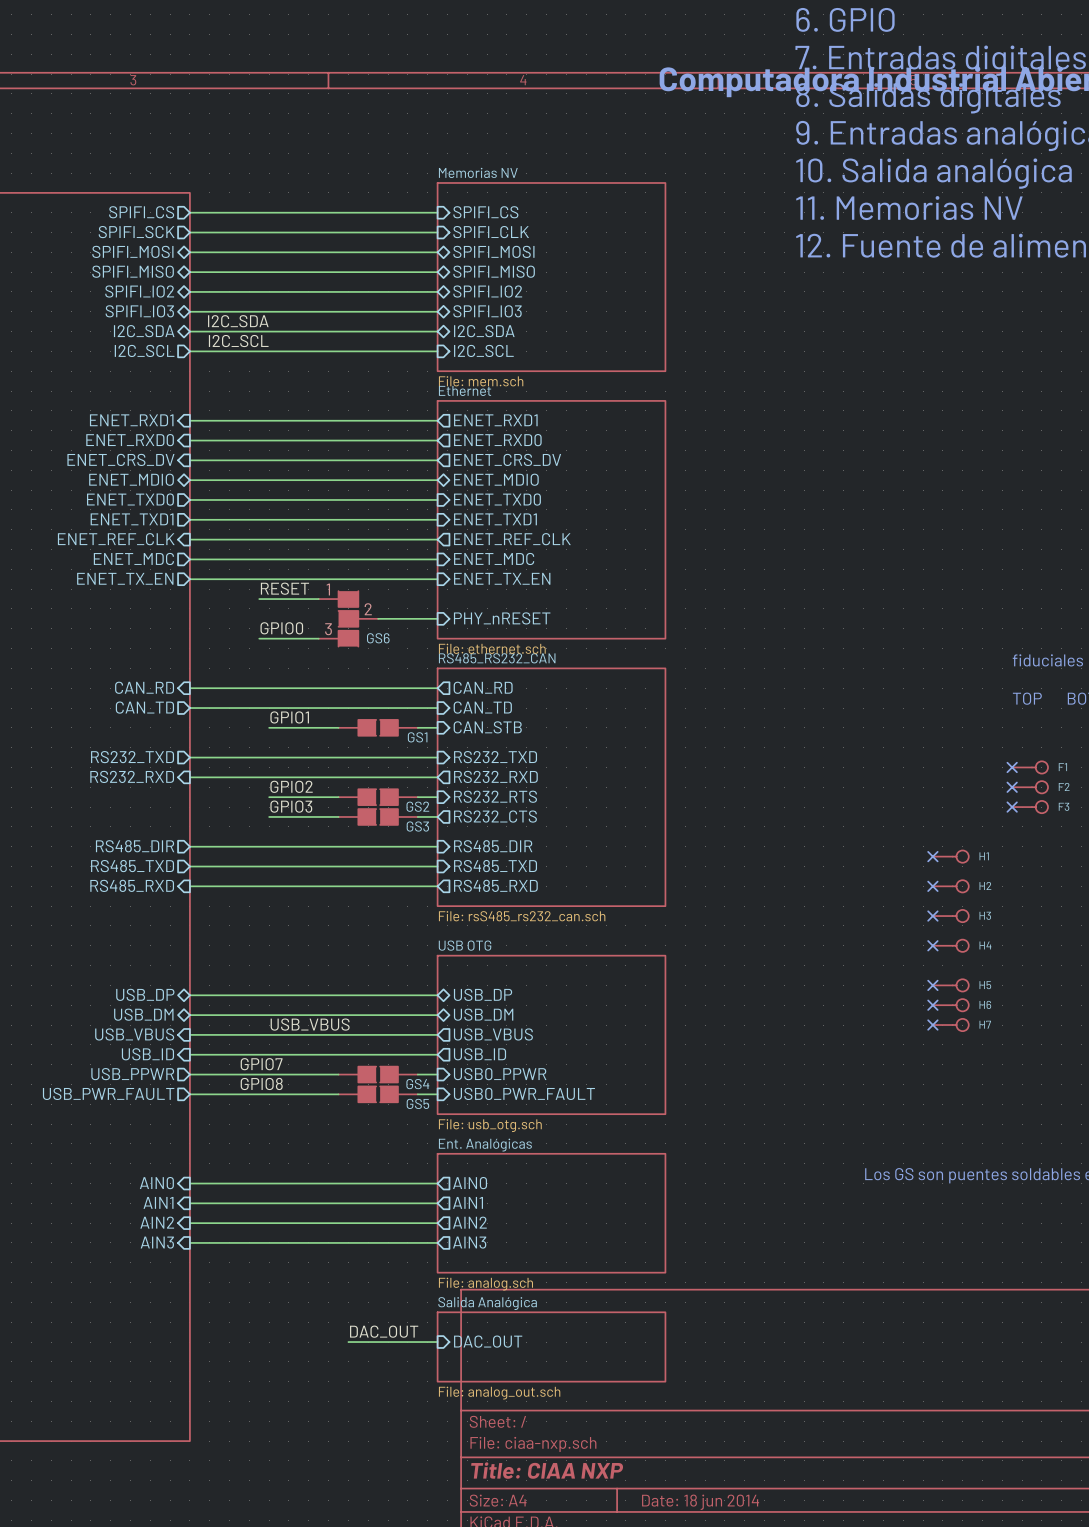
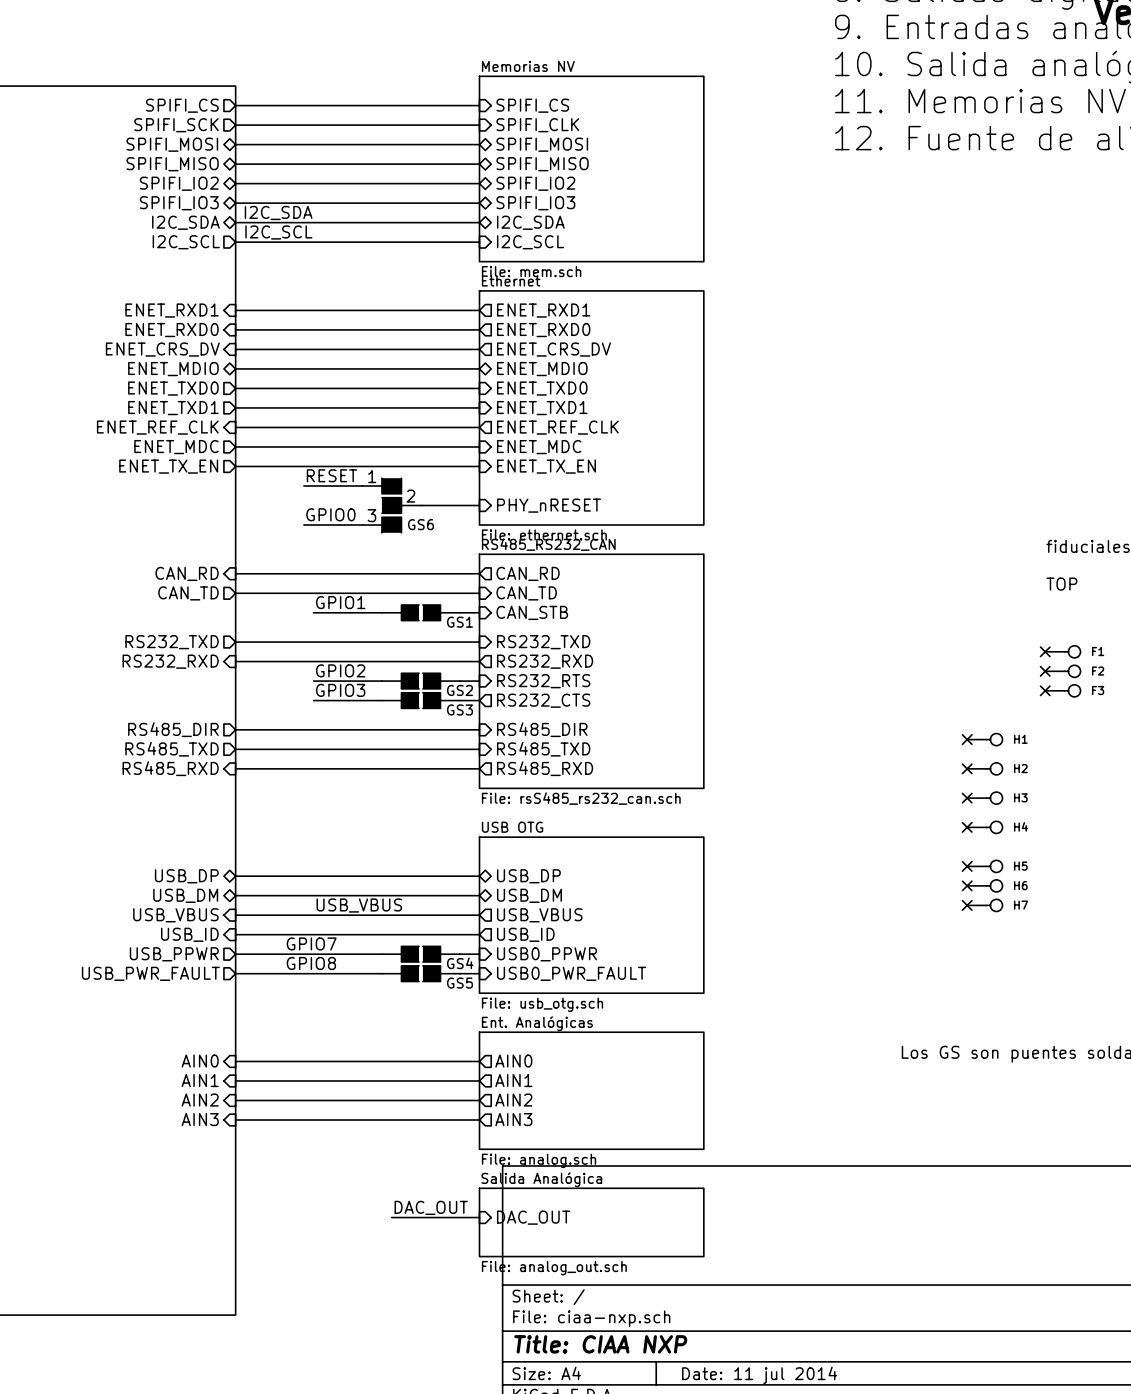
title block: Date: 18 jun 2014 (700, 1502) -> Date: 11 jul 2014 (759, 1375)

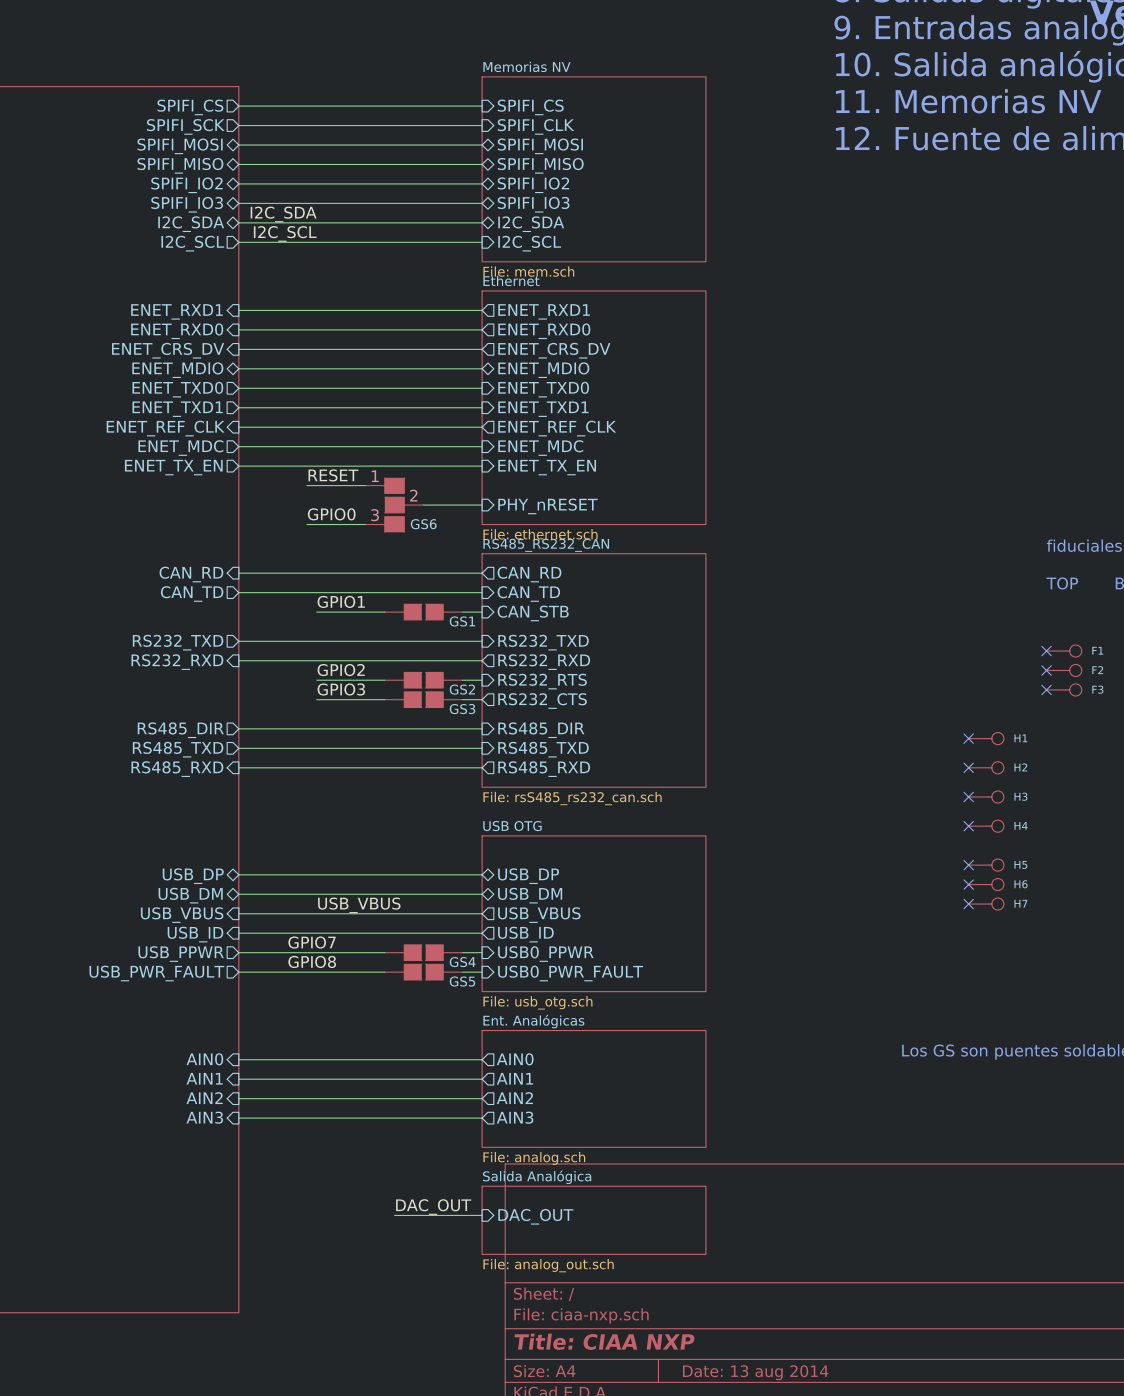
title block: Date: 11 jul 2014 (759, 1375) -> Date: 13 aug 2014 (755, 1372)

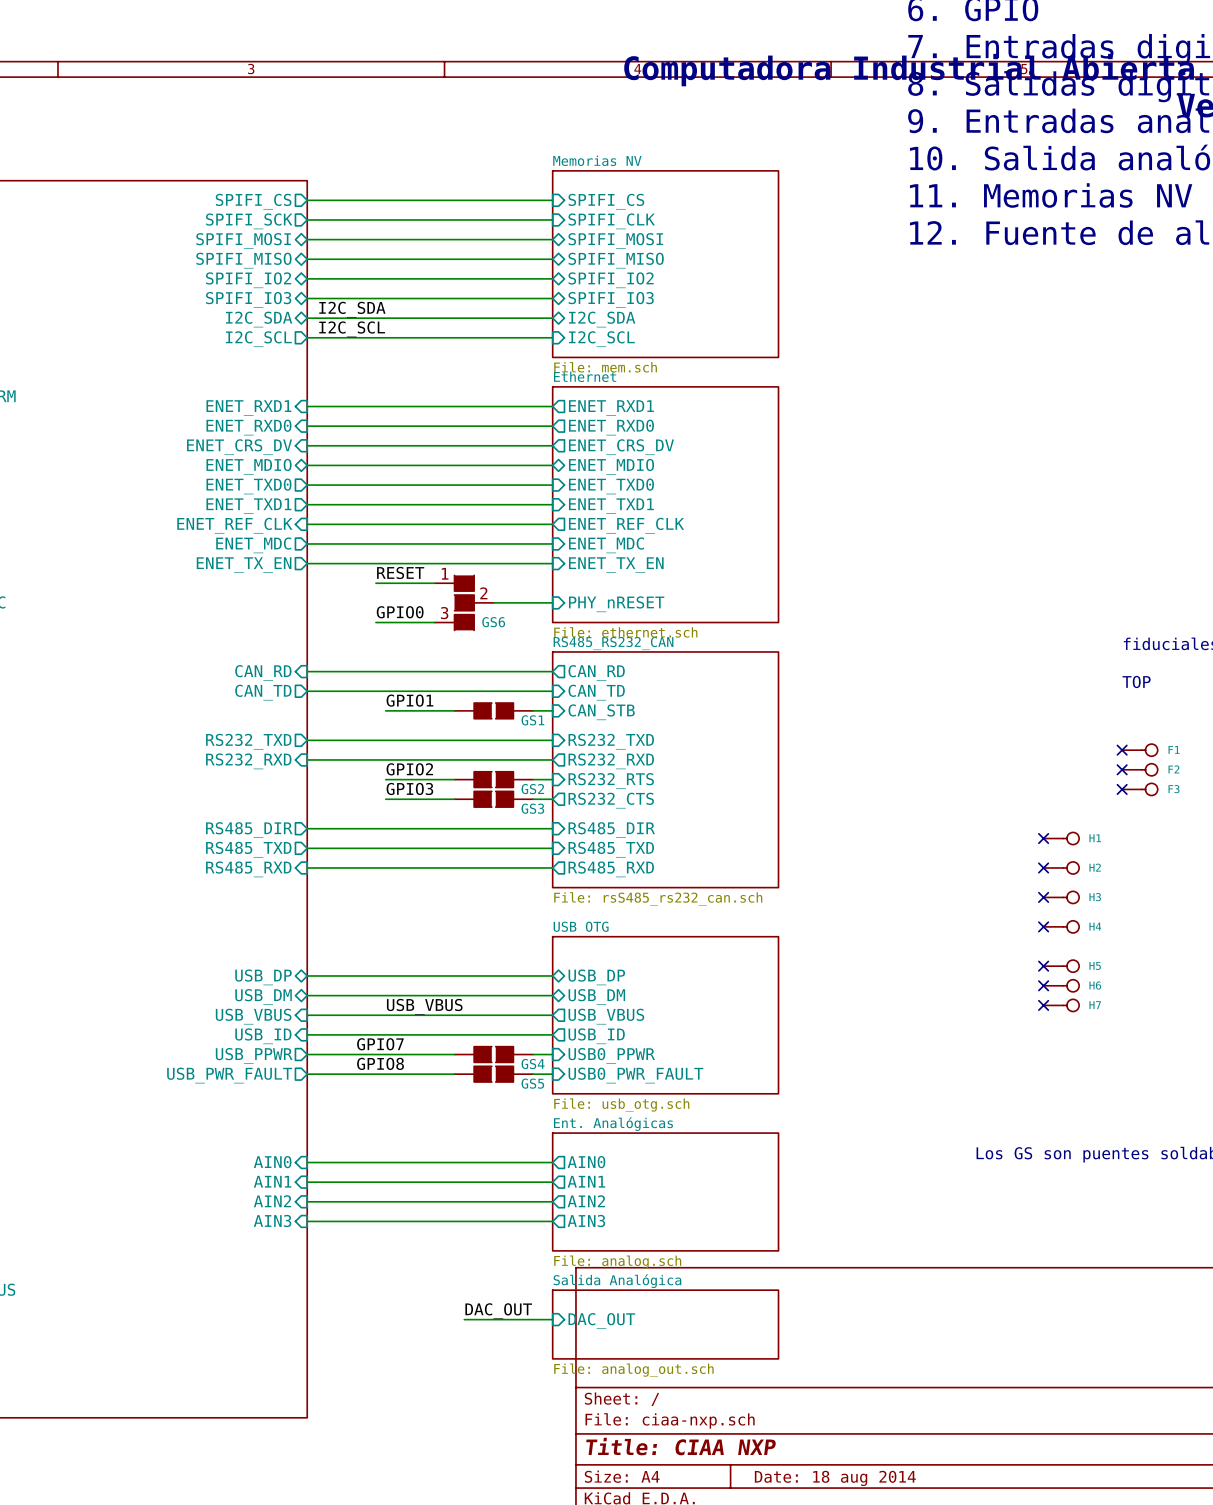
title block: Date: 13 aug 2014 (755, 1372) -> Date: 18 aug 2014 (835, 1478)

